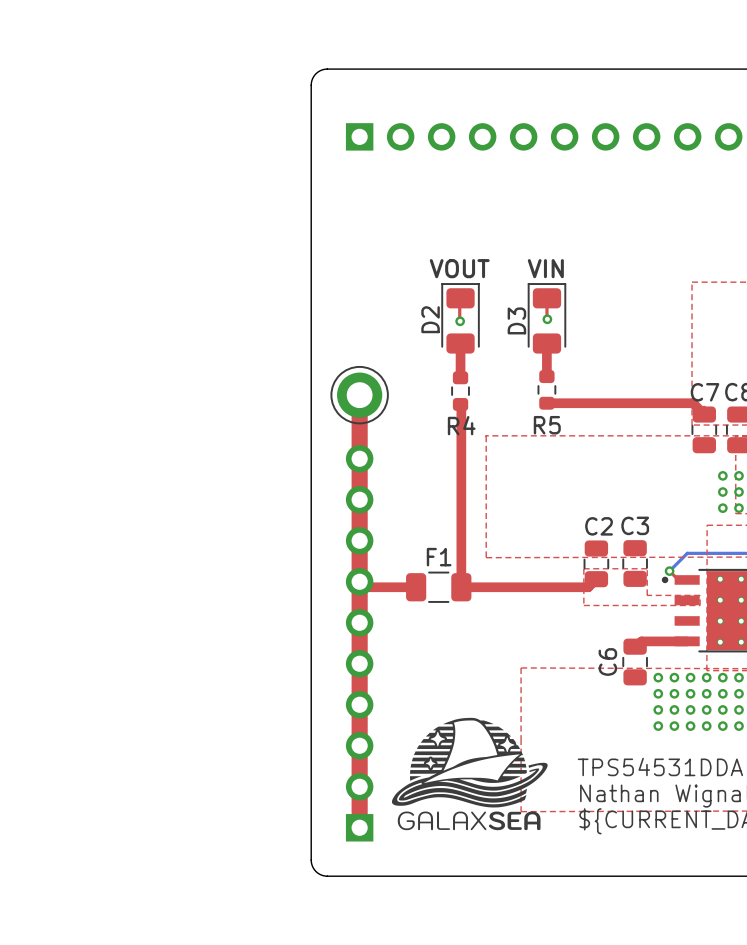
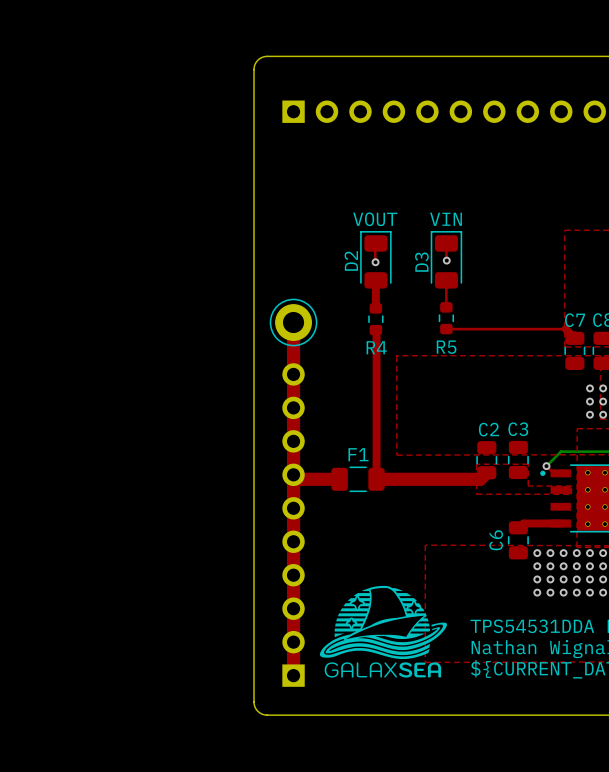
top track width: thick (546, 343) (546, 376) -> thin (446, 280) (446, 307)
top track width: thick (546, 403) (692, 403) -> thin (446, 329) (565, 329)
top track width: thin (596, 579) (588, 587) (461, 587) -> thick (486, 472) (480, 479) (376, 479)
top track width: thin (359, 581) (365, 587) (416, 587) -> thick (293, 474) (298, 479) (339, 479)

